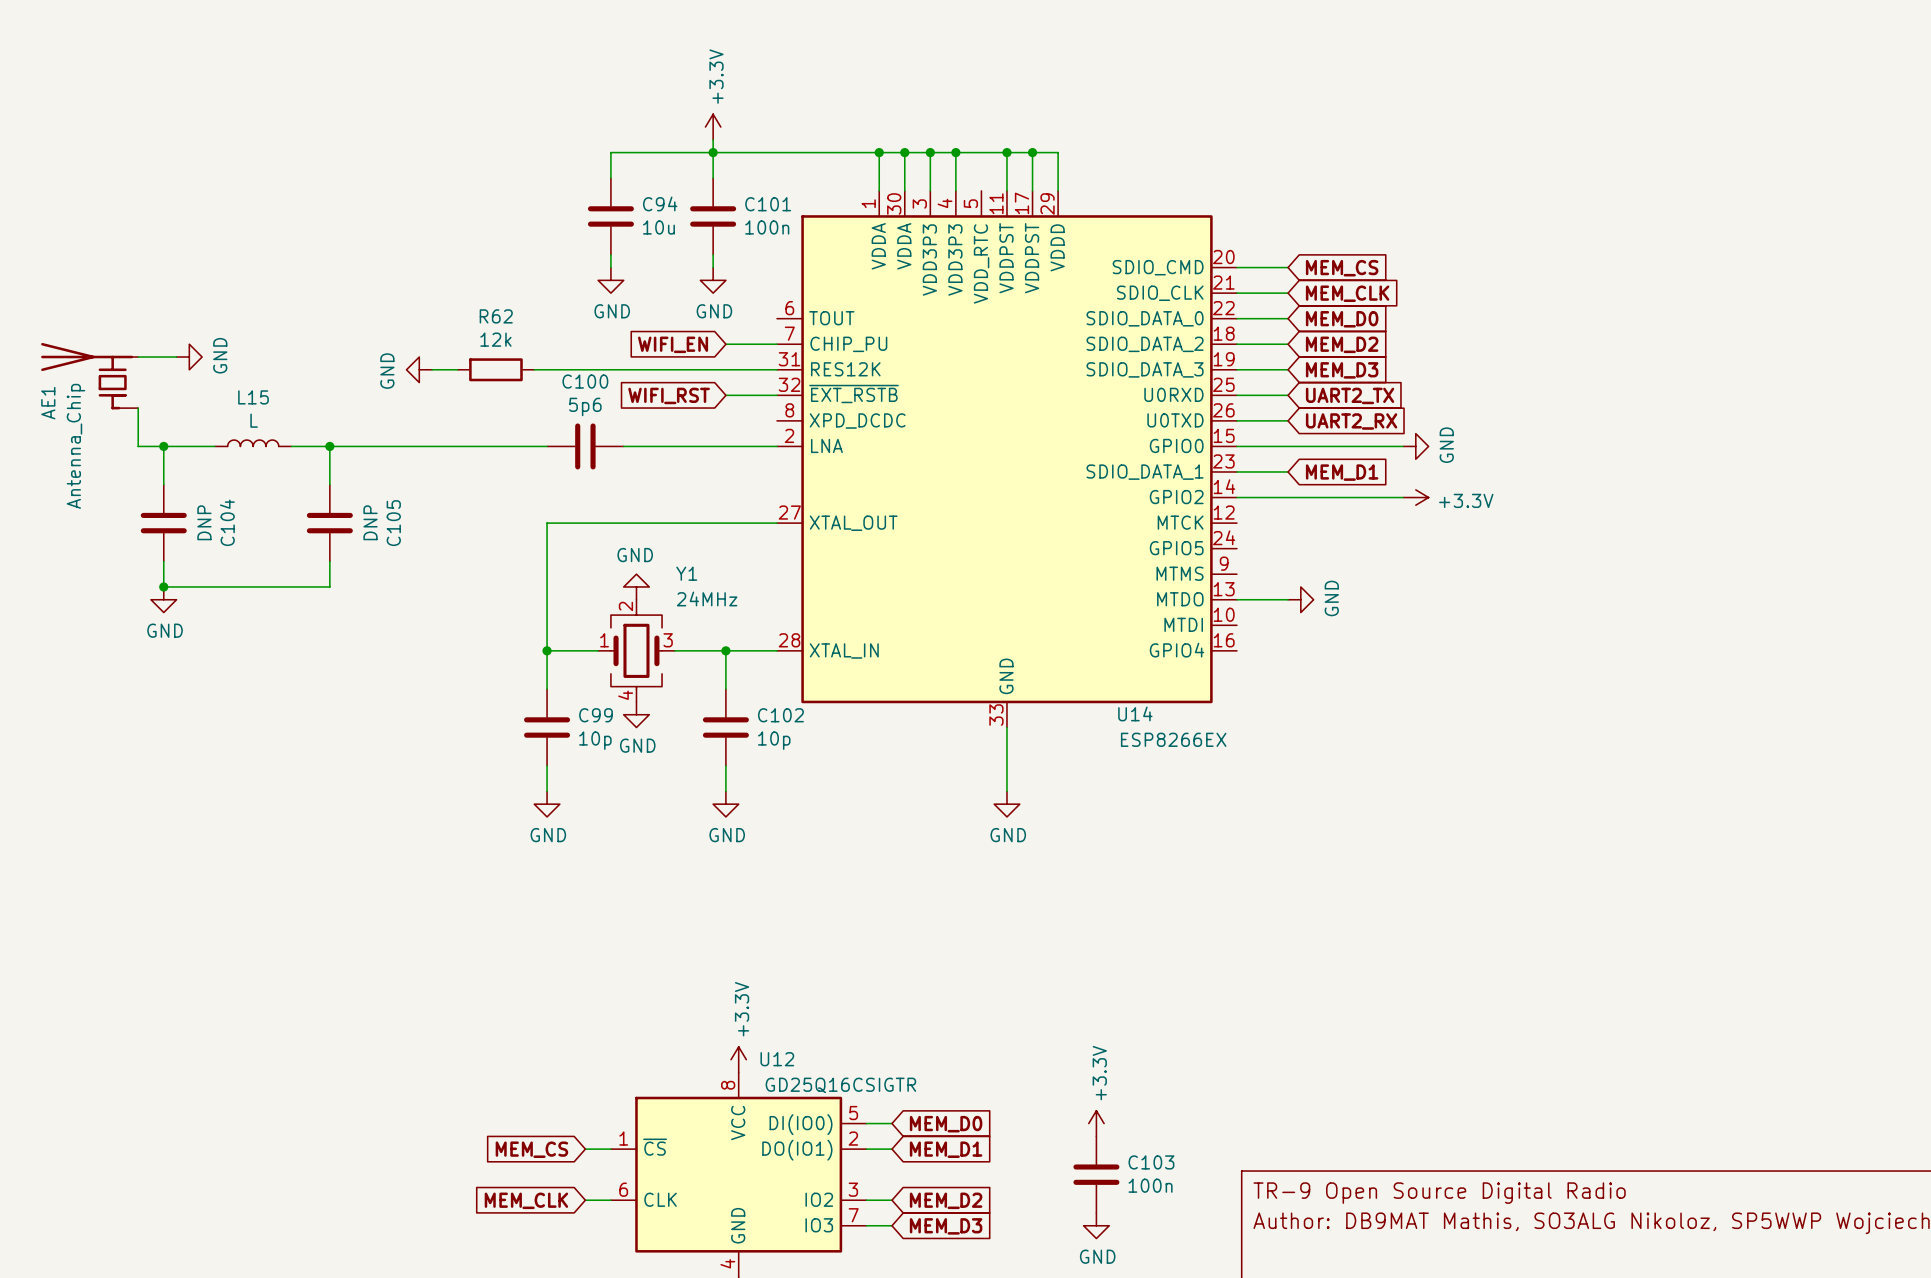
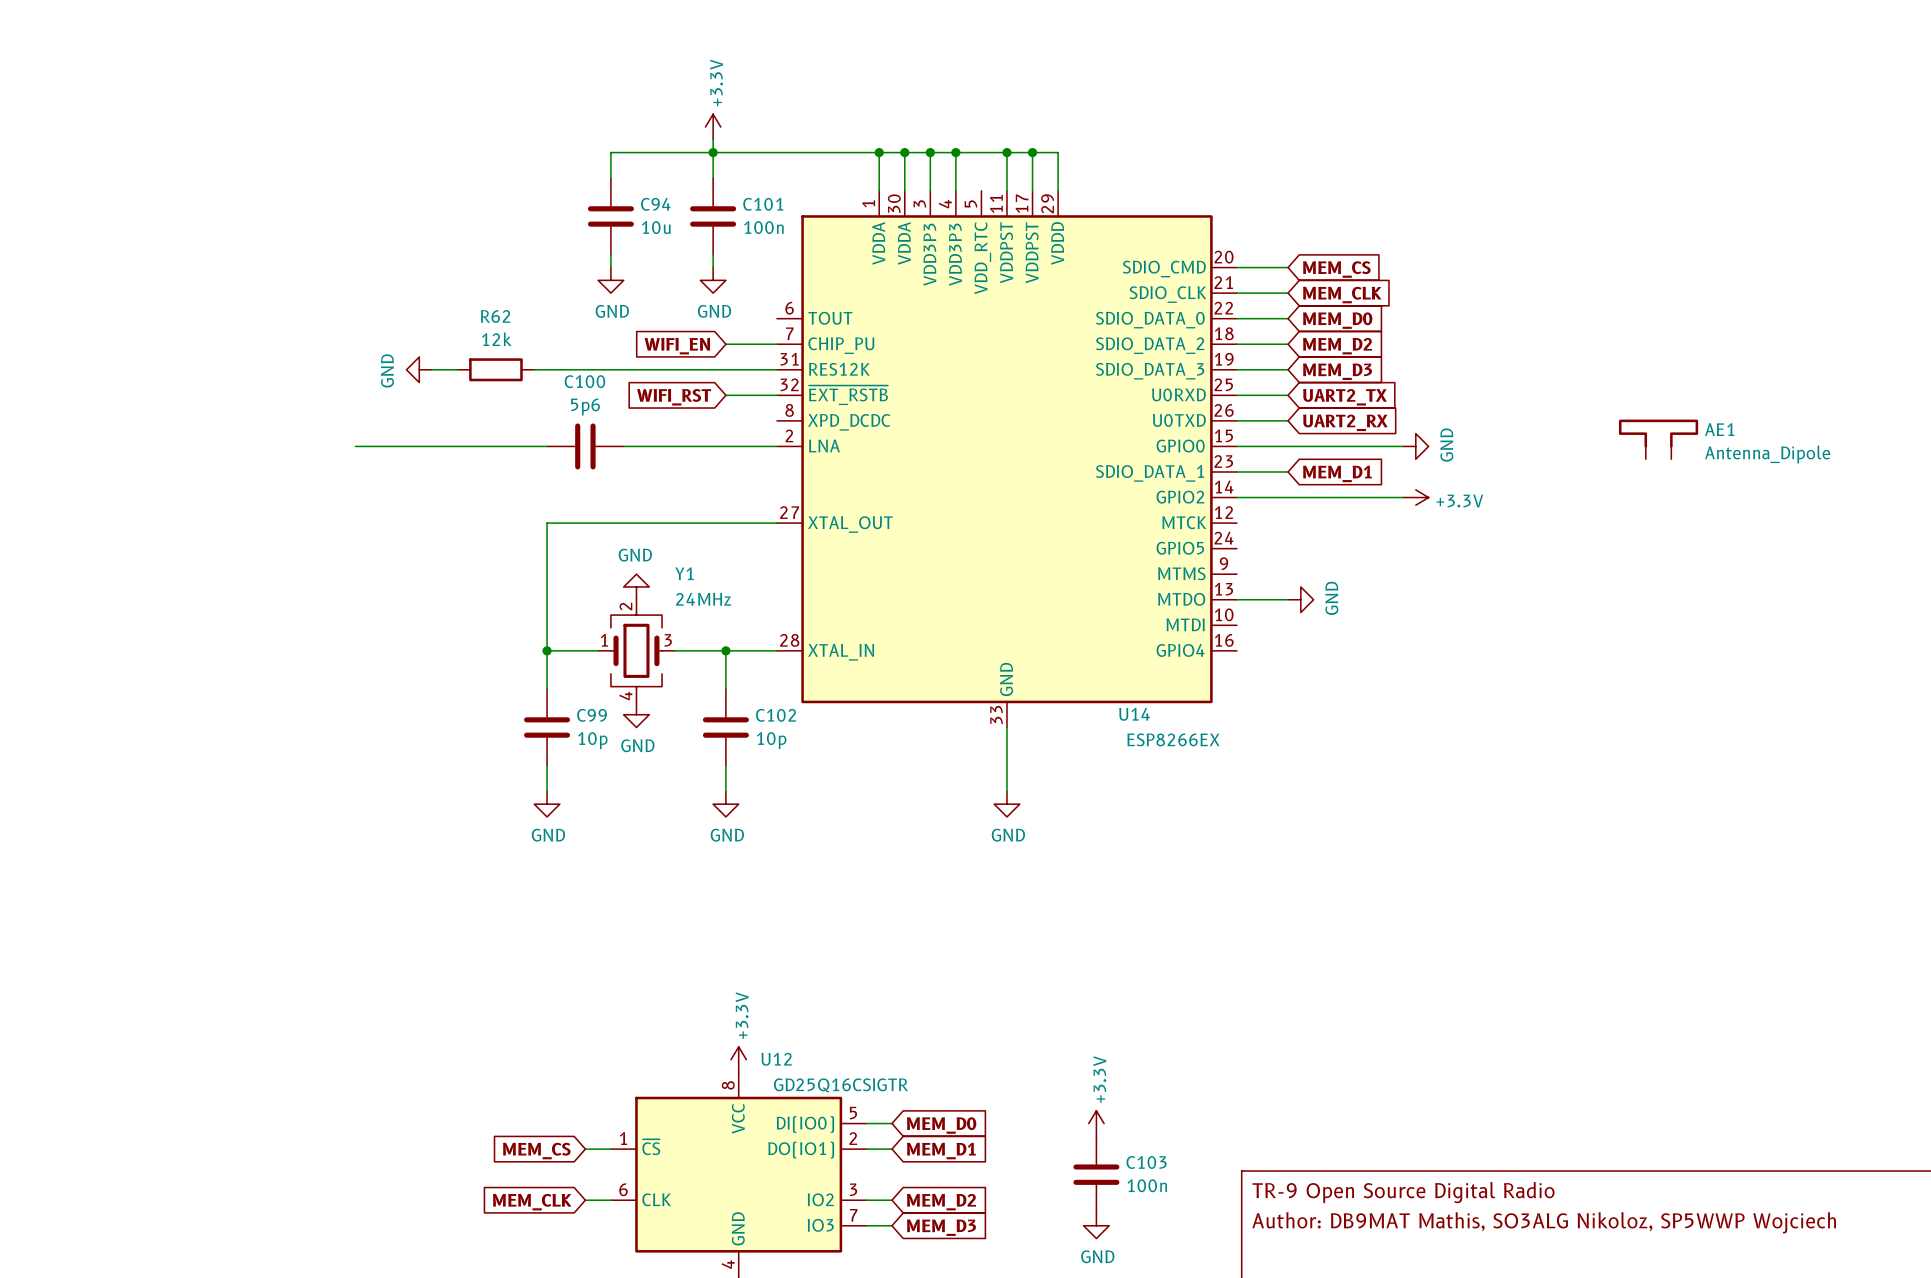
AE1 symbol: [41, 342, 139, 410] -> [1618, 419, 1699, 460]
wire: (138, 357) (176, 357) -> none
power symbol: GND (189, 357) -> none
AE1 name position: AE1 (48, 403) -> AE1 (1719, 429)
wire: (138, 408) (138, 446) (214, 446) -> none
L15: L (253, 443) -> none
AE1 value: Antenna_Chip (75, 446) -> Antenna_Dipole (1767, 454)
wire: (163, 446) (163, 484) -> none
junction: (163, 446) -> none
wire: (291, 446) (355, 446) -> none
wire: (329, 446) (329, 484) -> none
junction: (329, 446) -> none
C104: DNP (163, 523) -> none
C105: DNP (329, 523) -> none
wire: (163, 561) (163, 586) (329, 586) (329, 561) -> none
junction: (163, 586) -> none
power symbol: GND (163, 599) -> none

